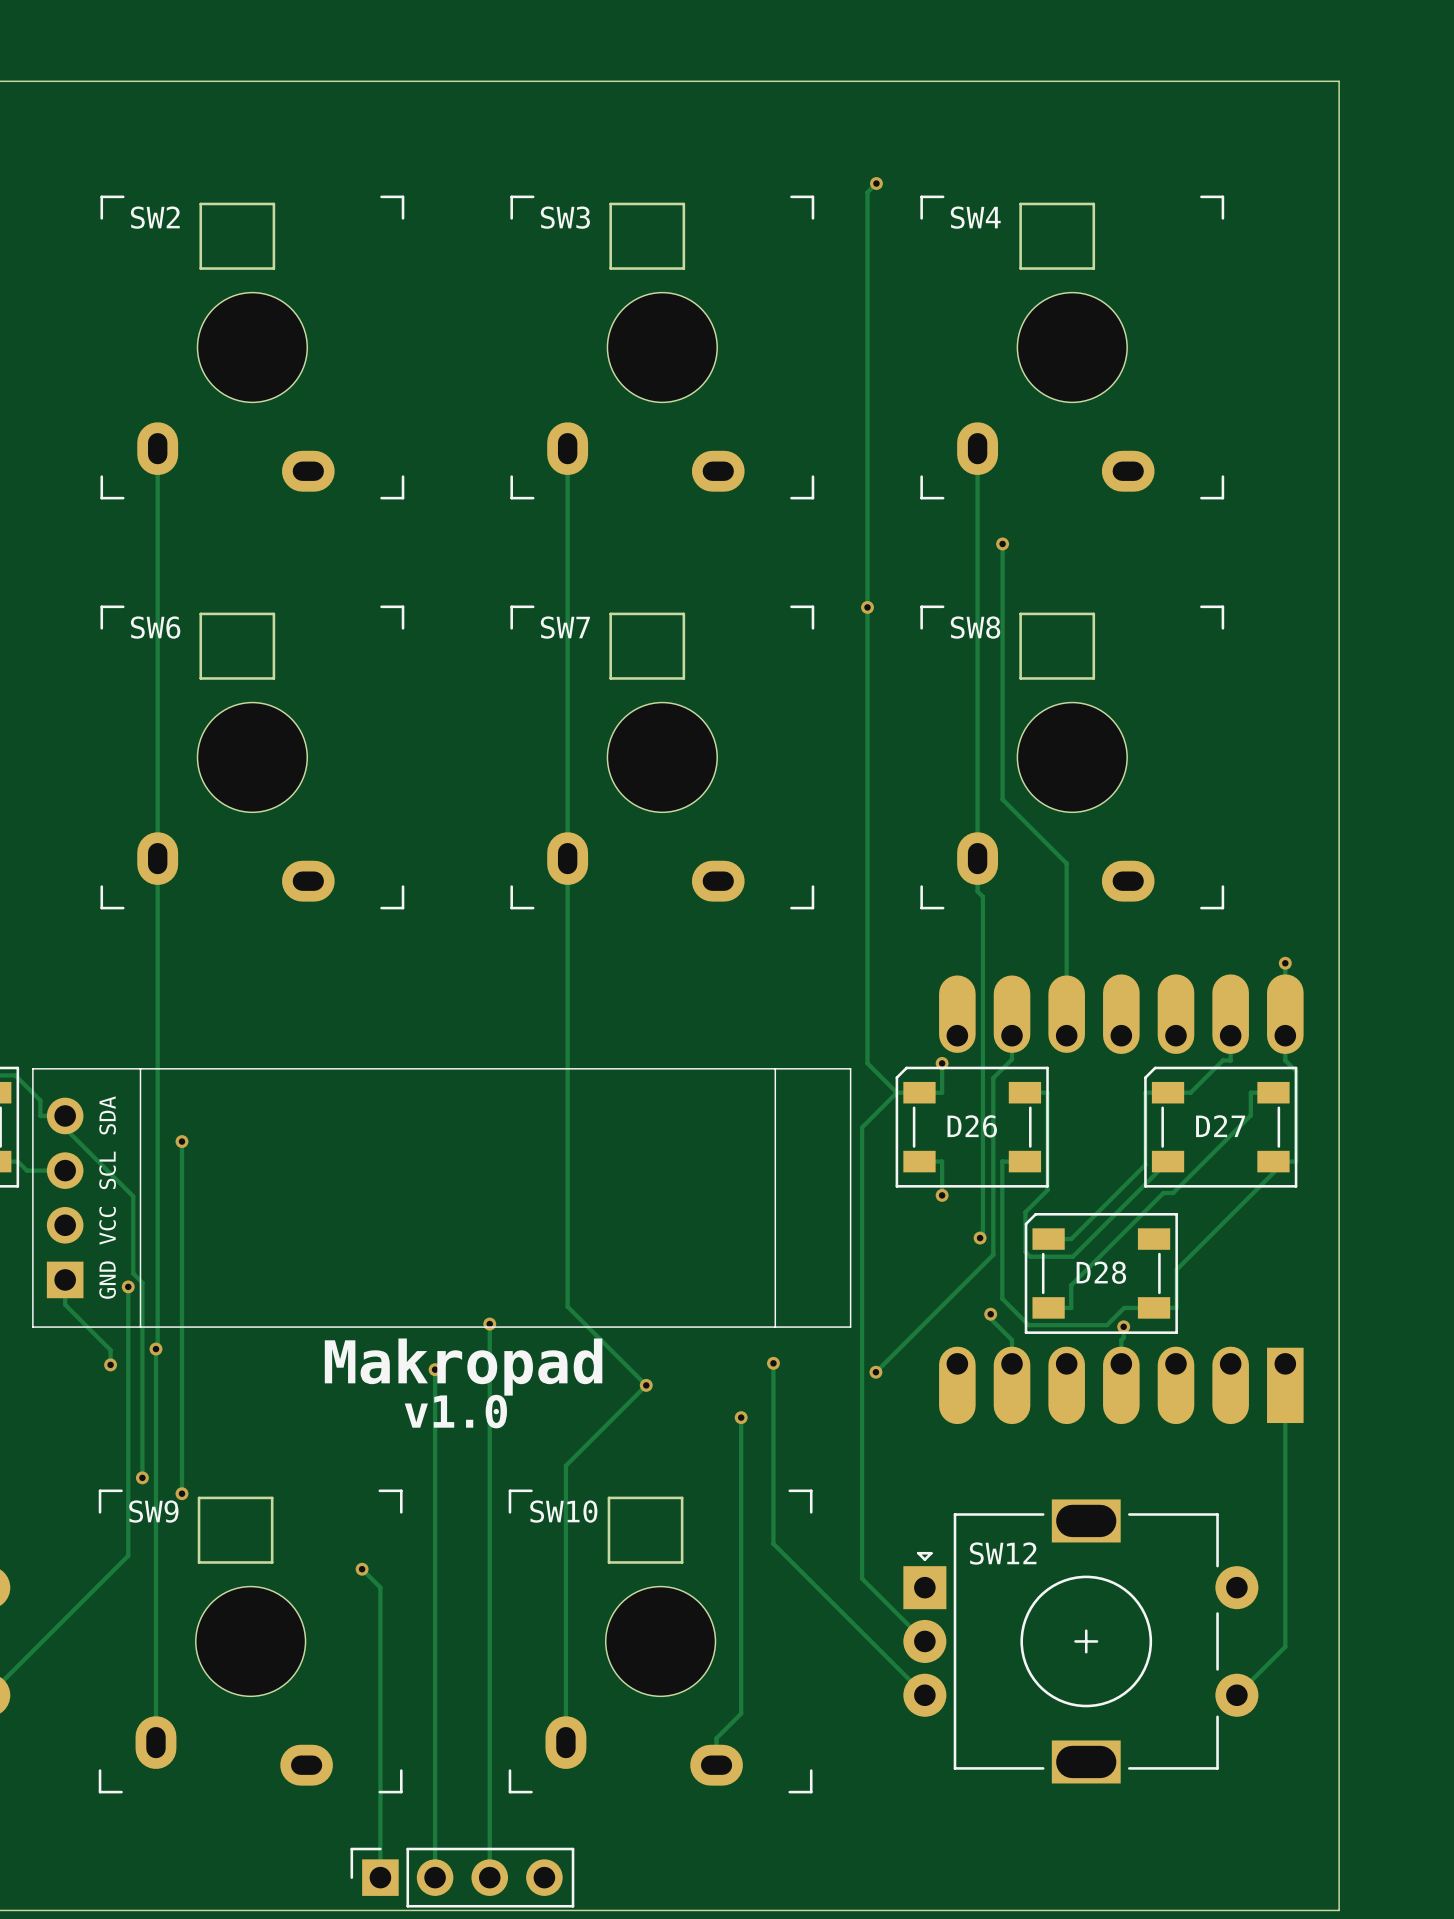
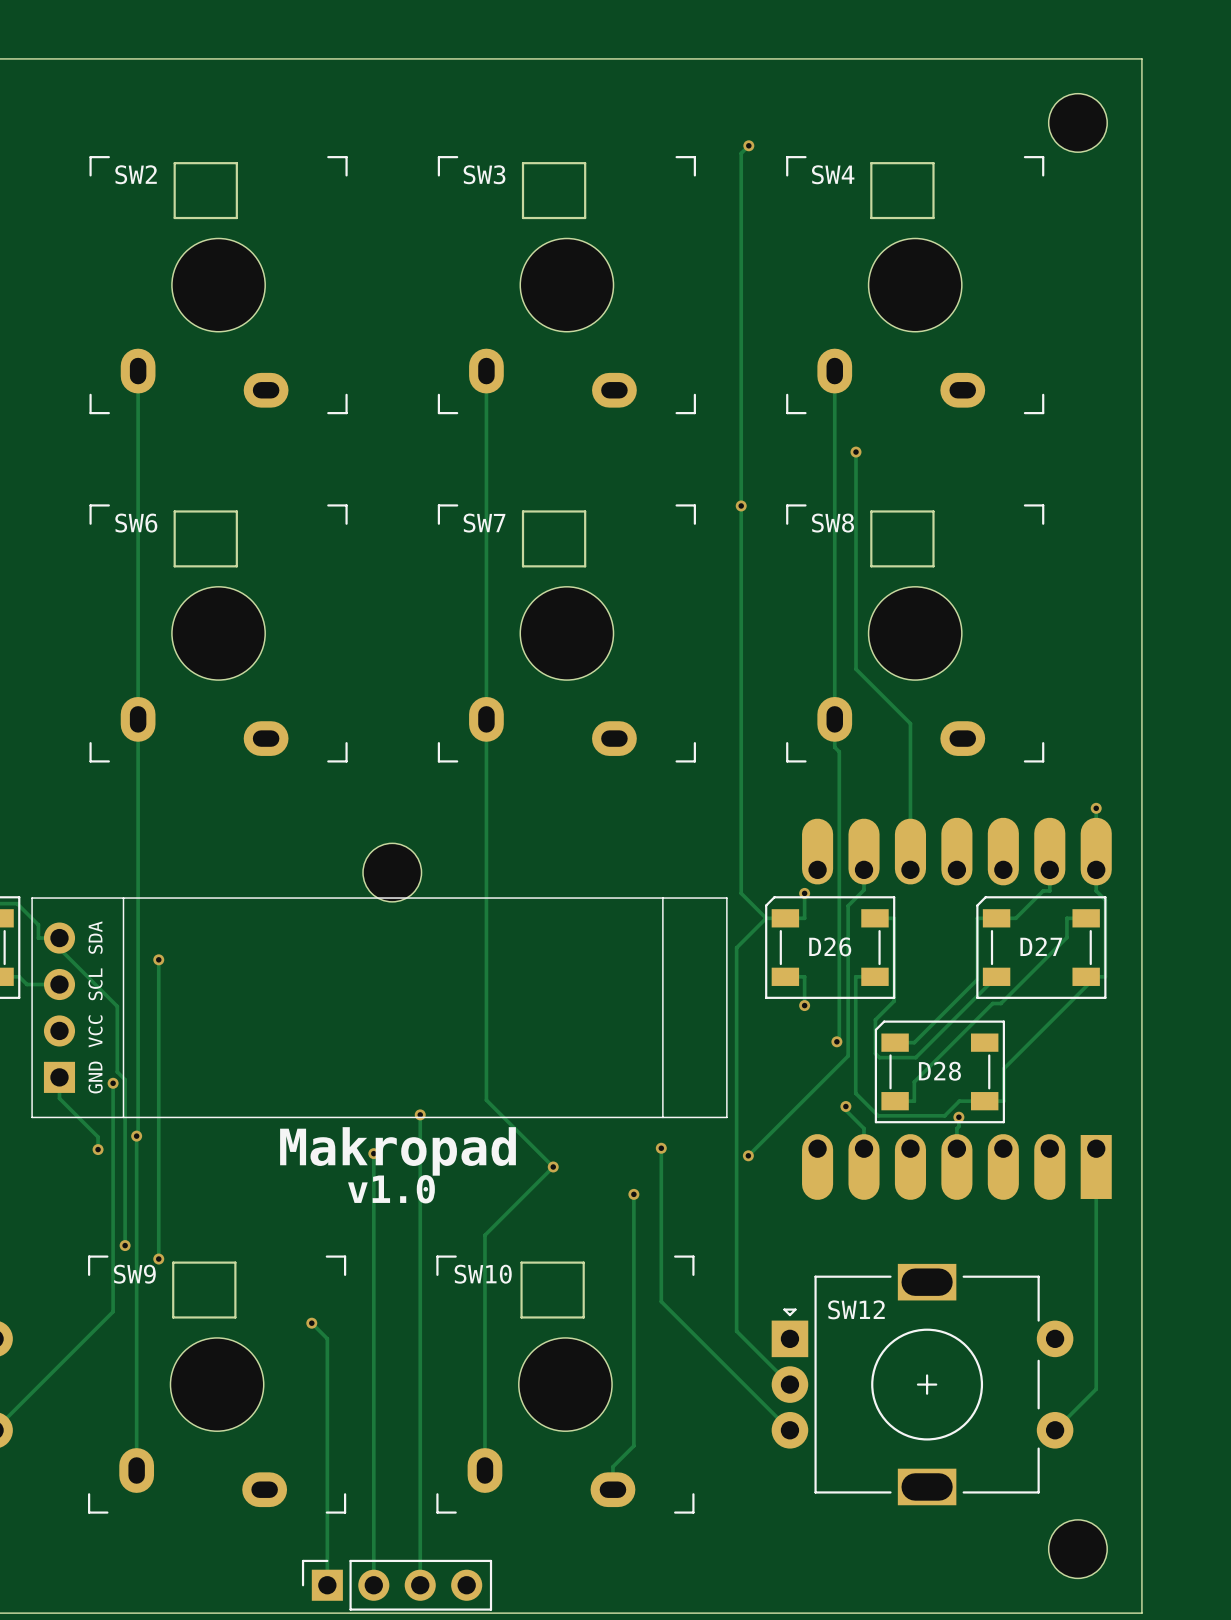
part: none -> (1077, 122)
part: none -> (392, 872)
part: none -> (1077, 1549)

